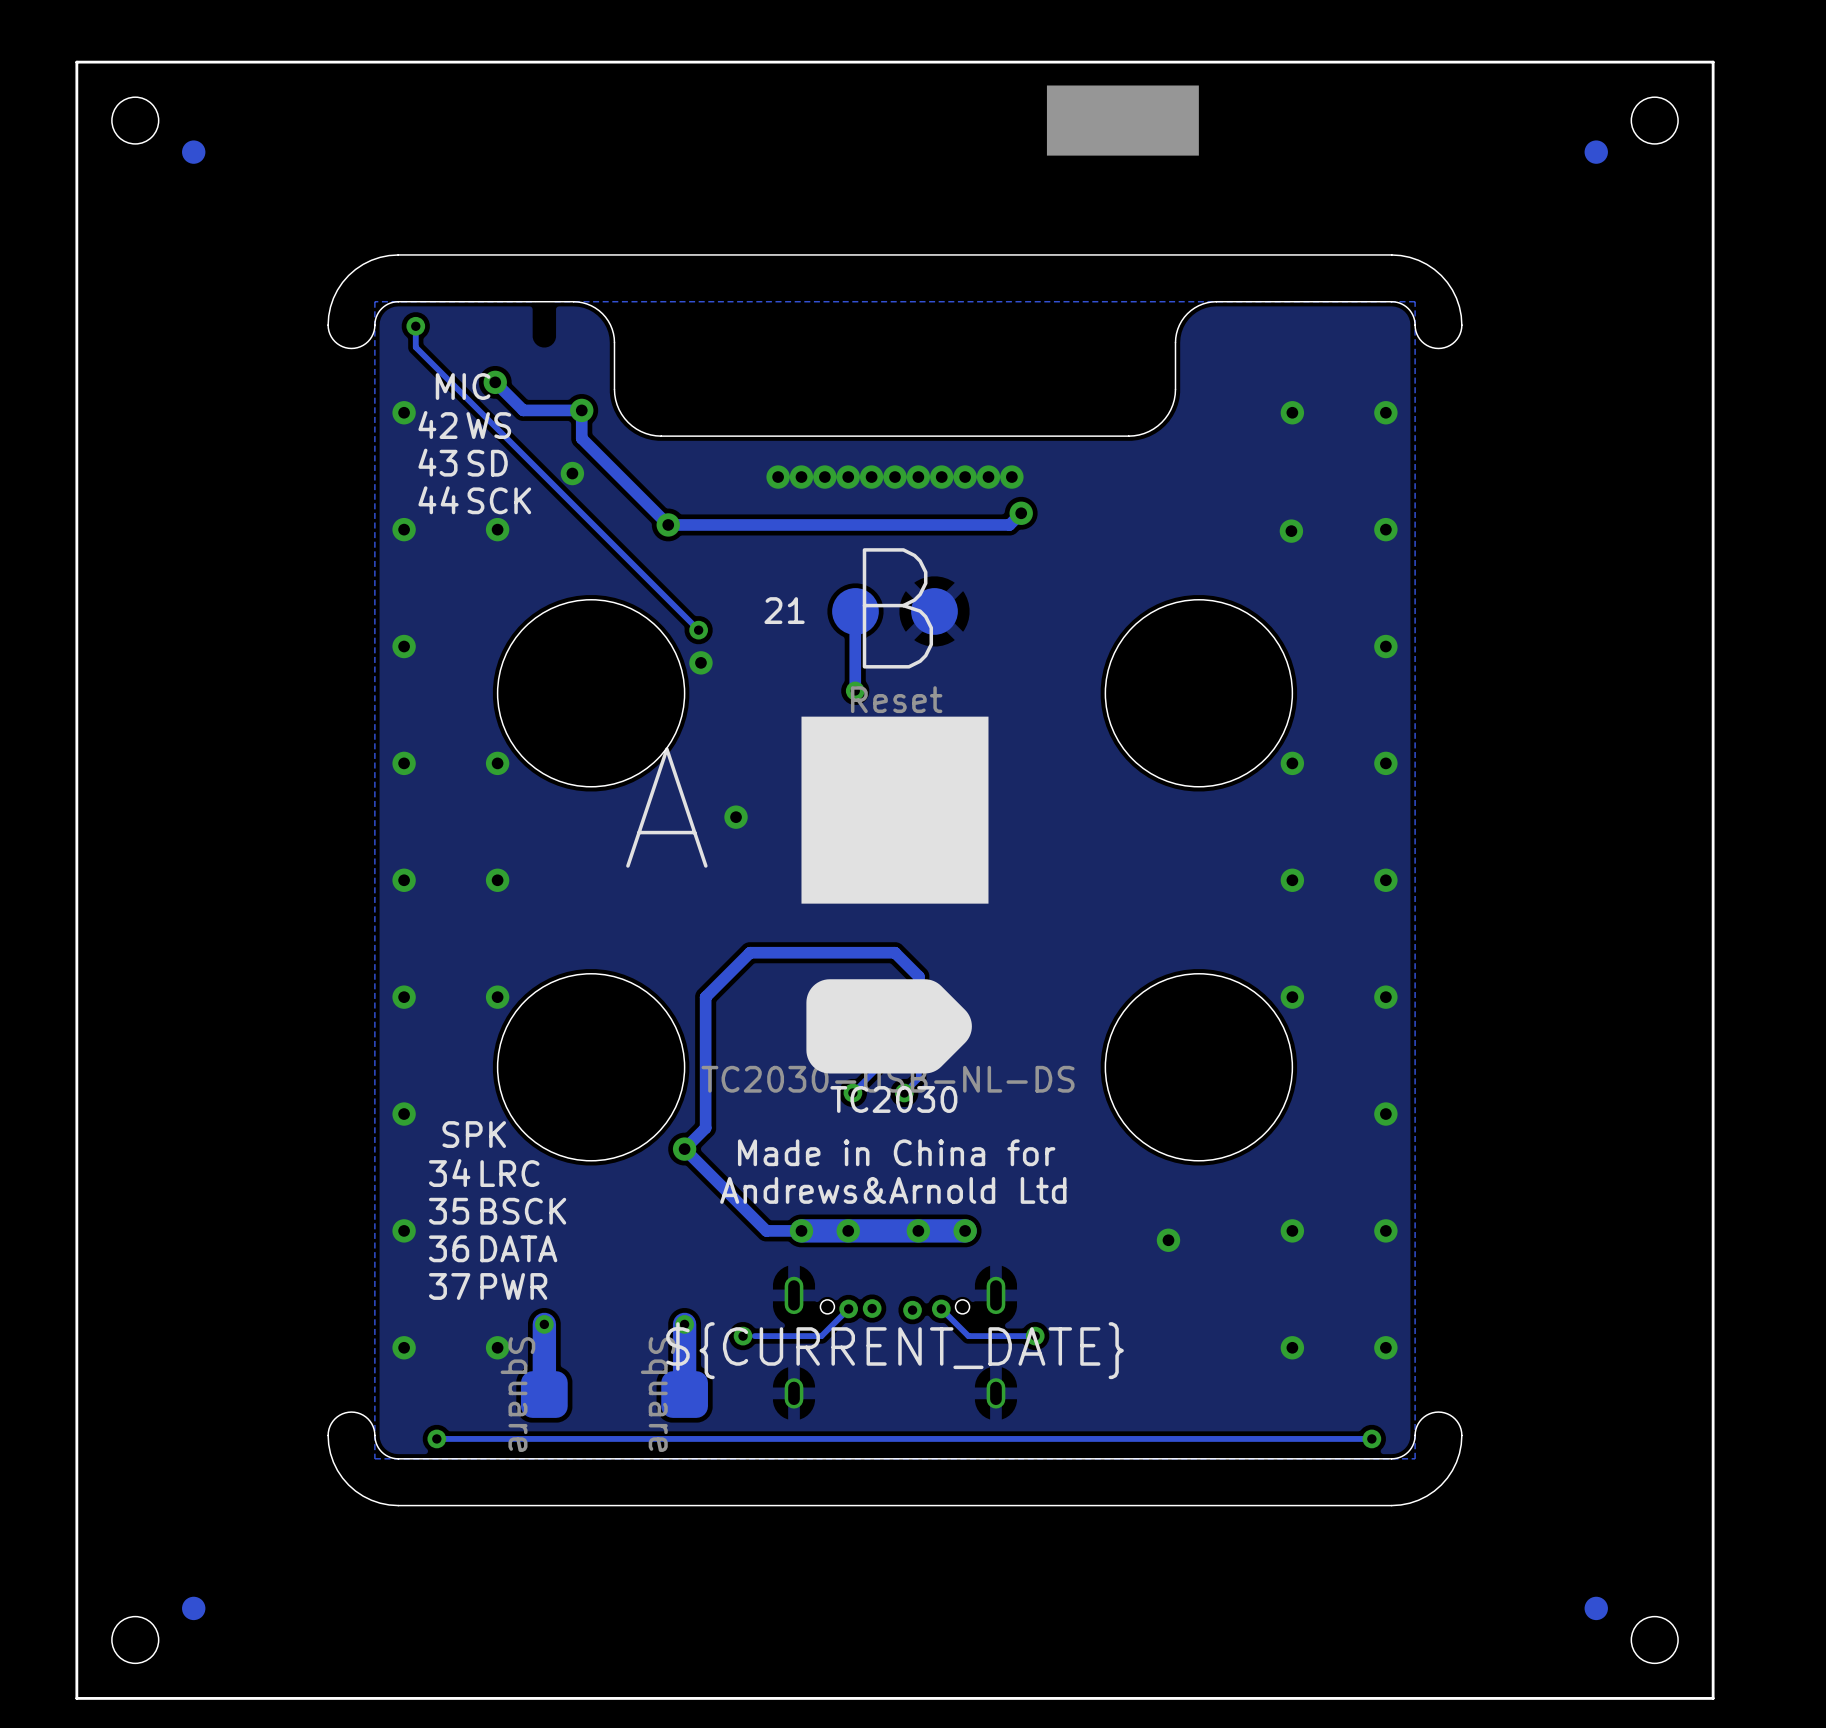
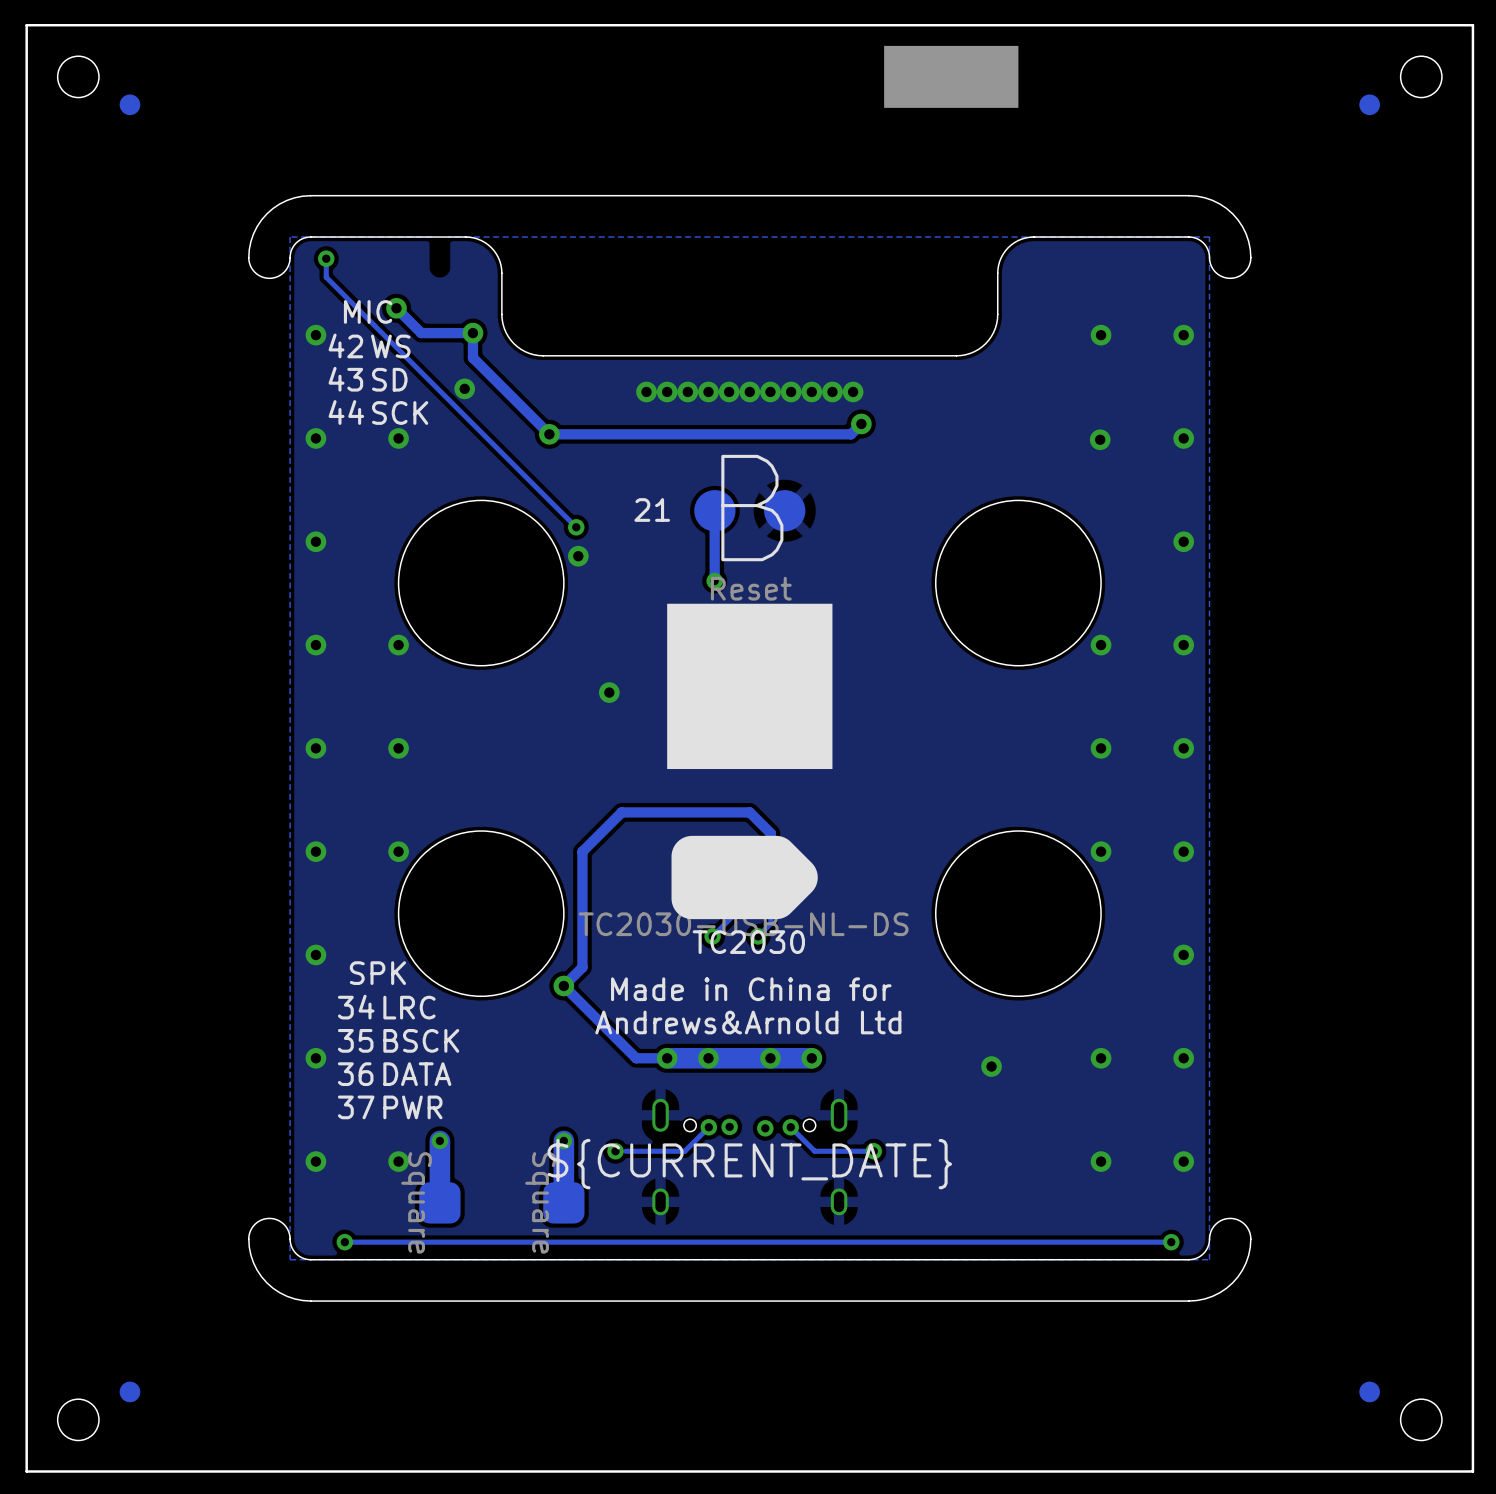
text: A (666, 807) -> none

